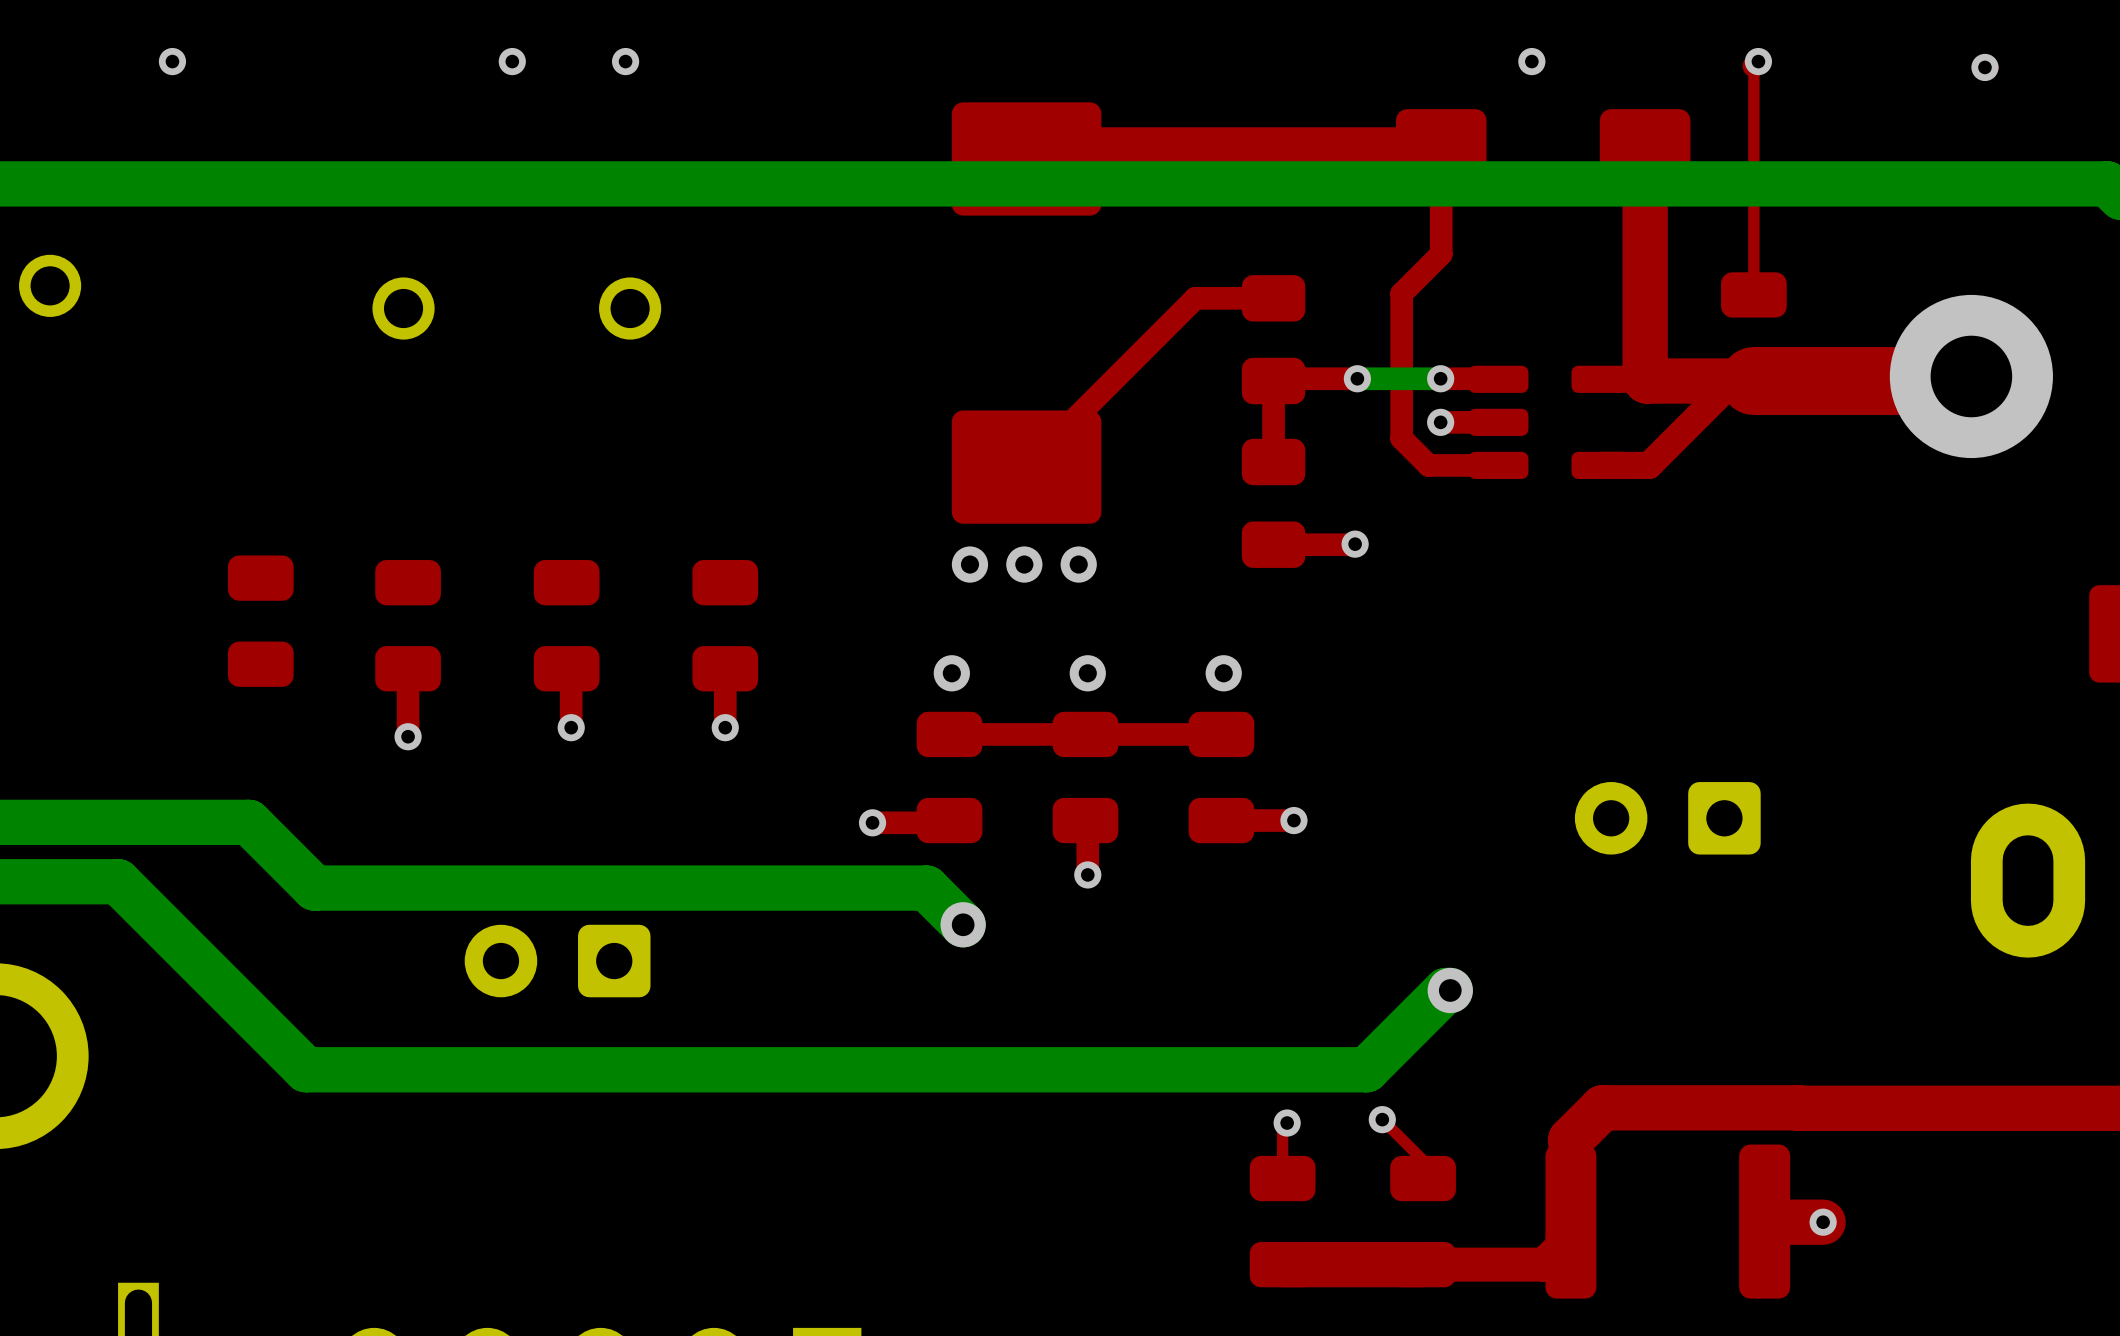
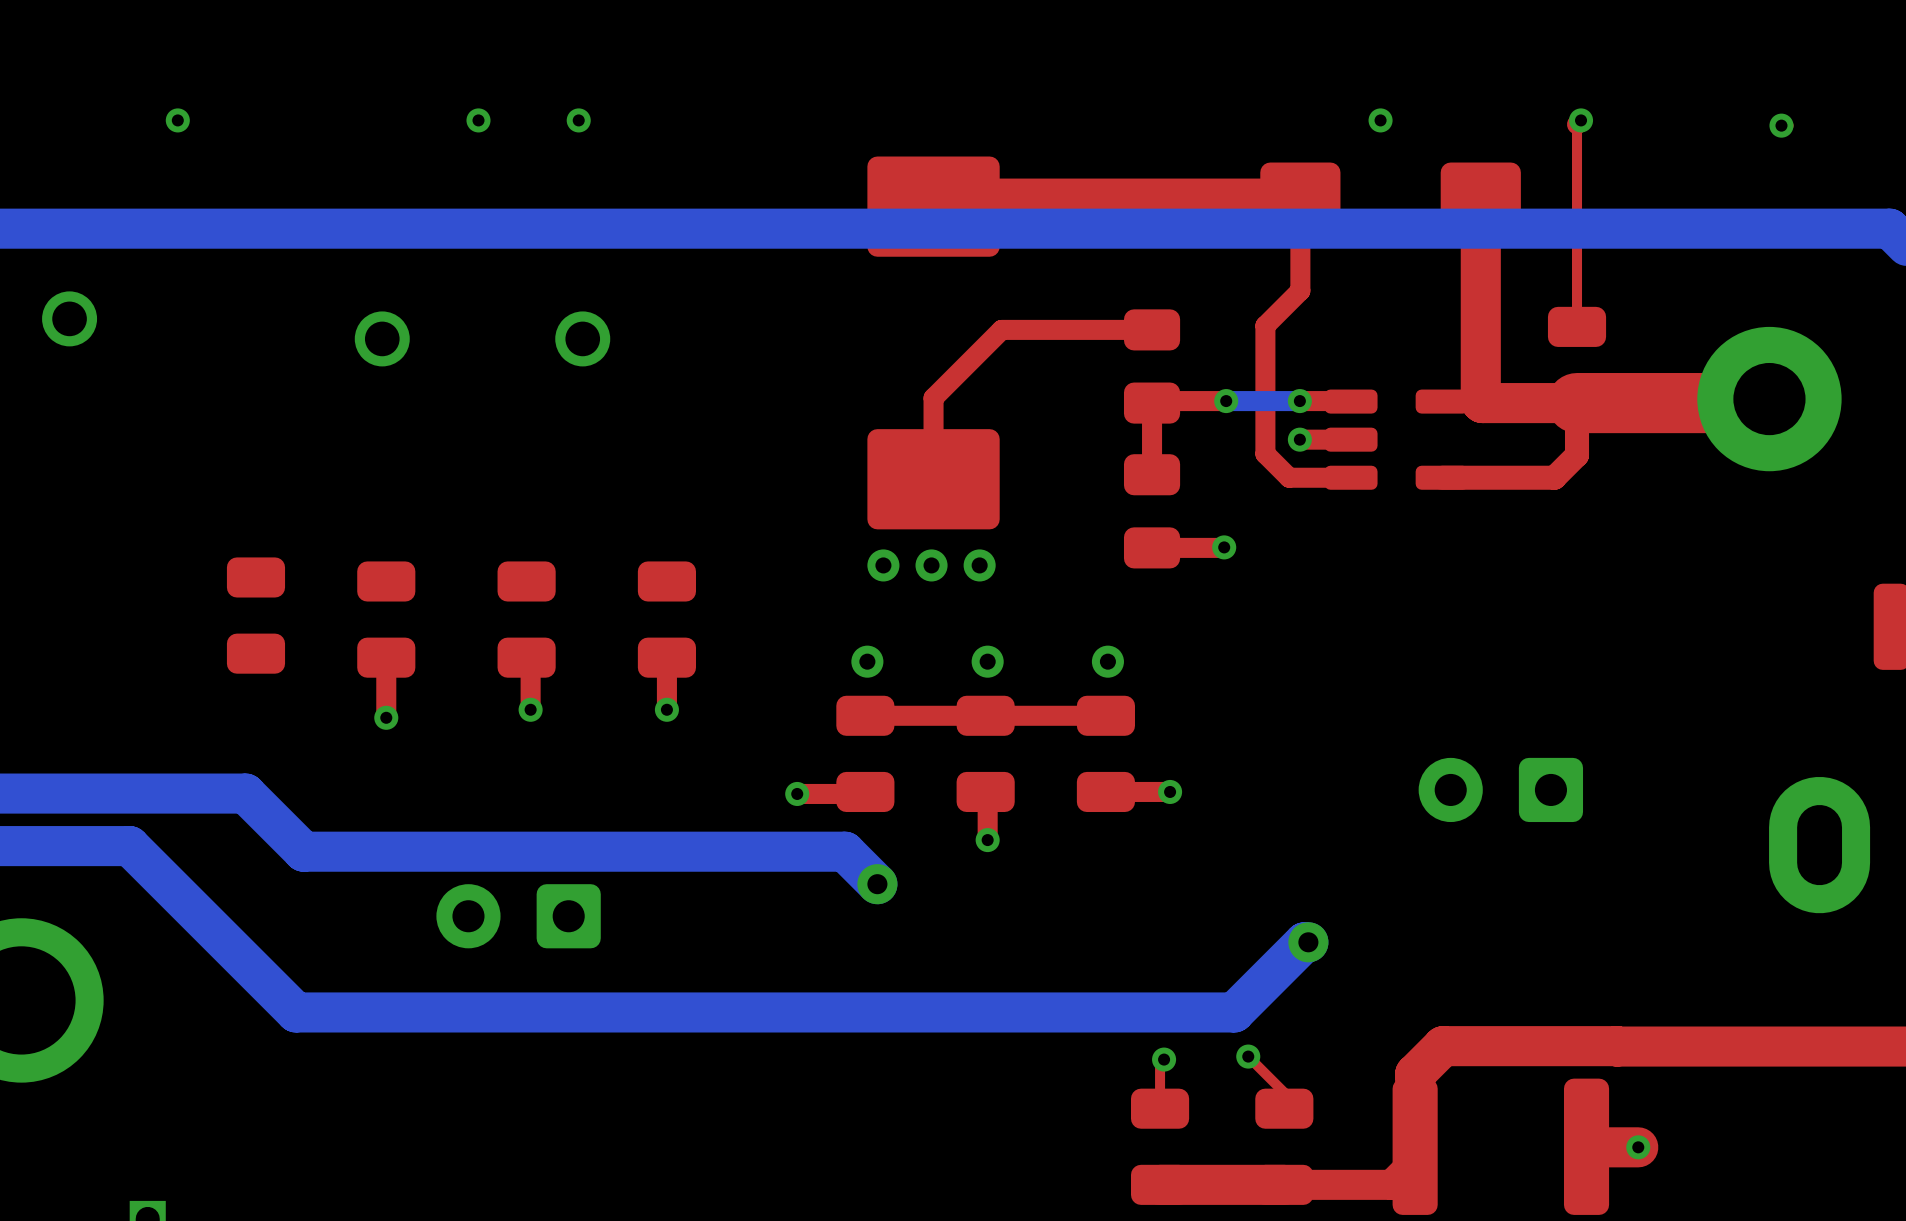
top track: (1195, 298) (1026, 467) -> (1082, 329) (1001, 329) (933, 398) (933, 479)
top track: (1753, 381) (1733, 381) (1649, 465) -> (1577, 403) (1577, 455) (1554, 477) (1484, 477)

